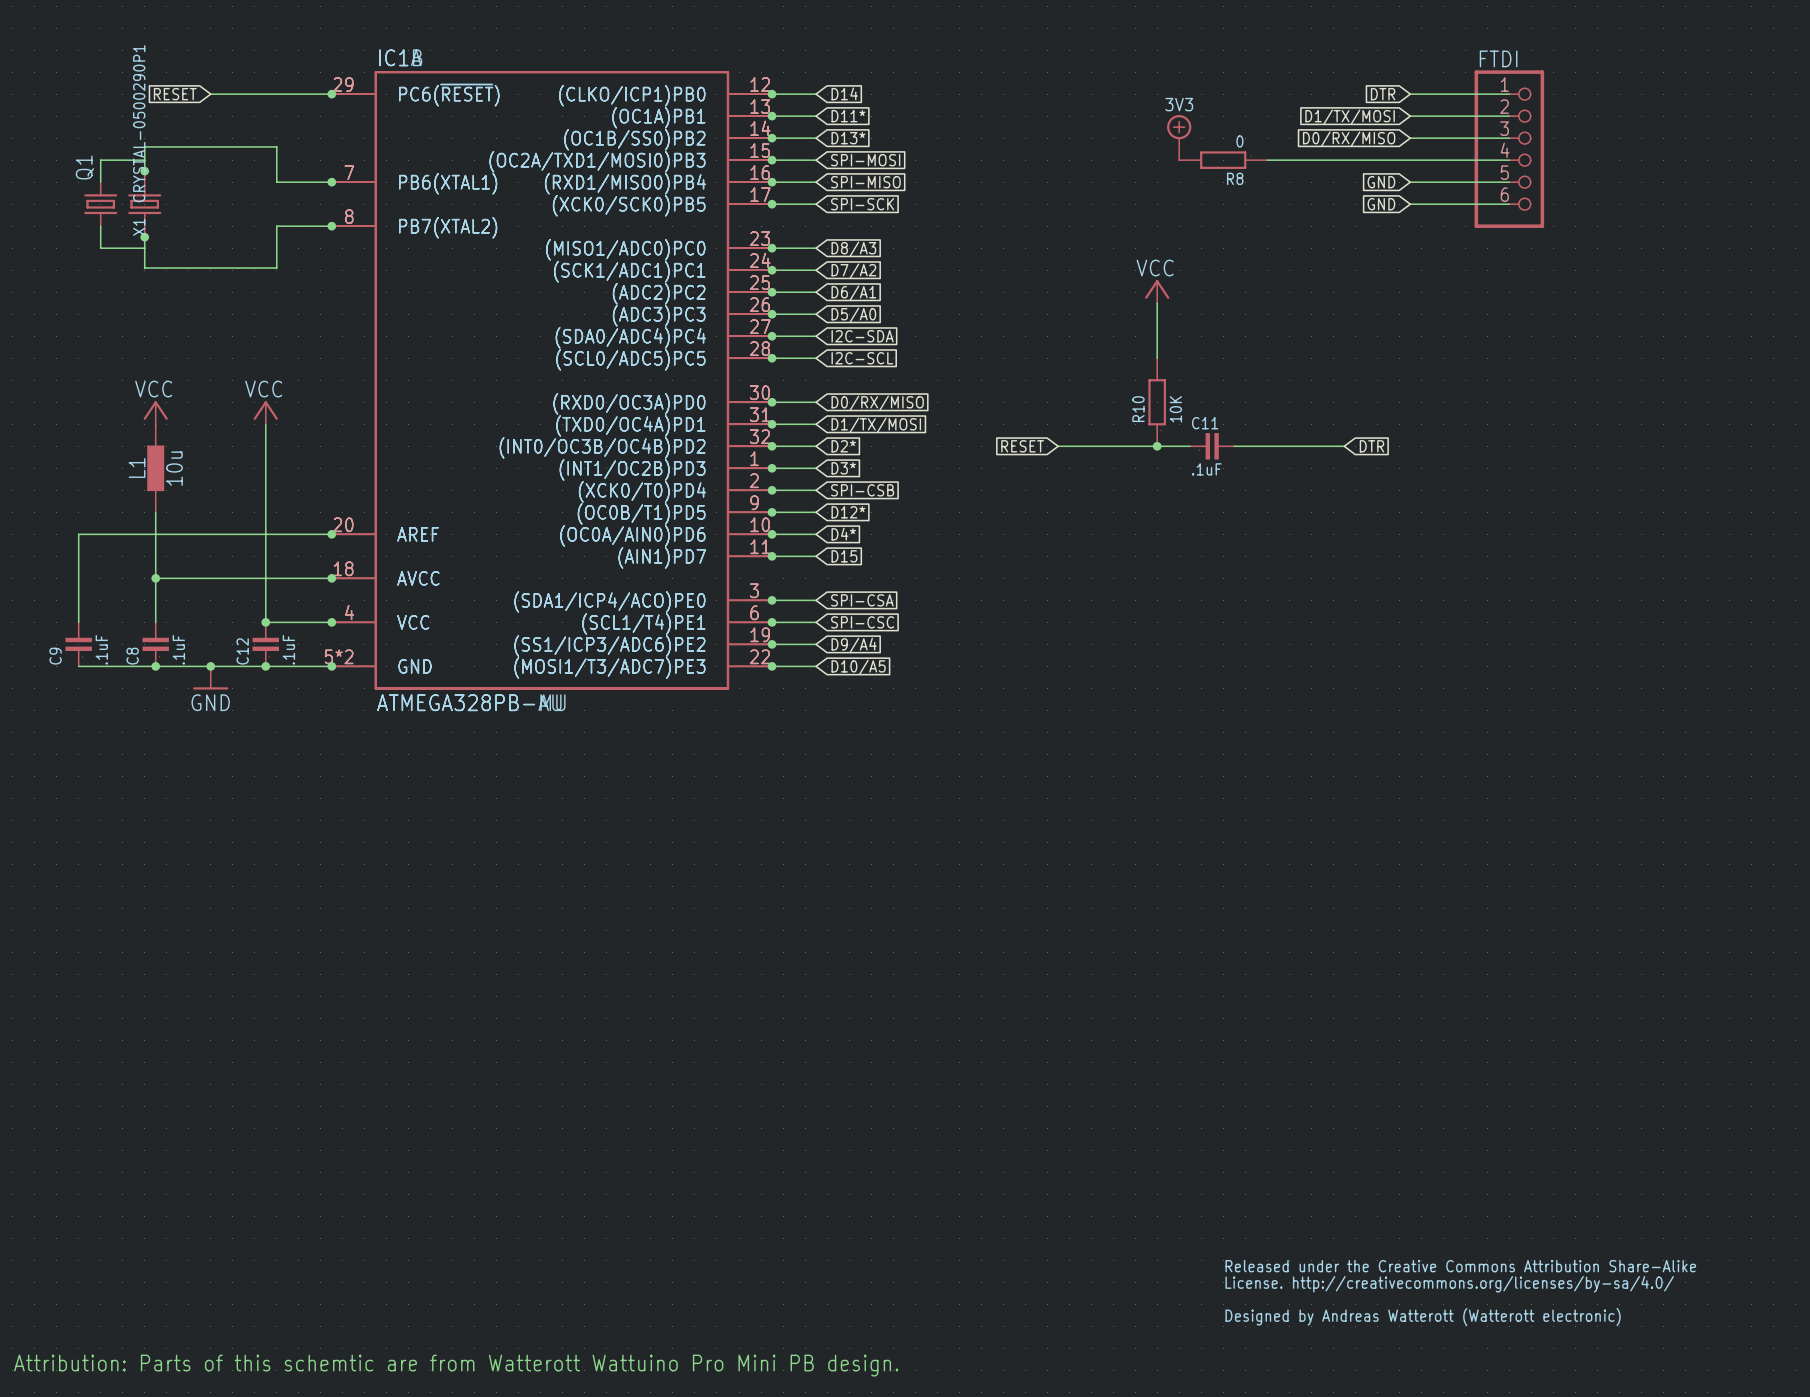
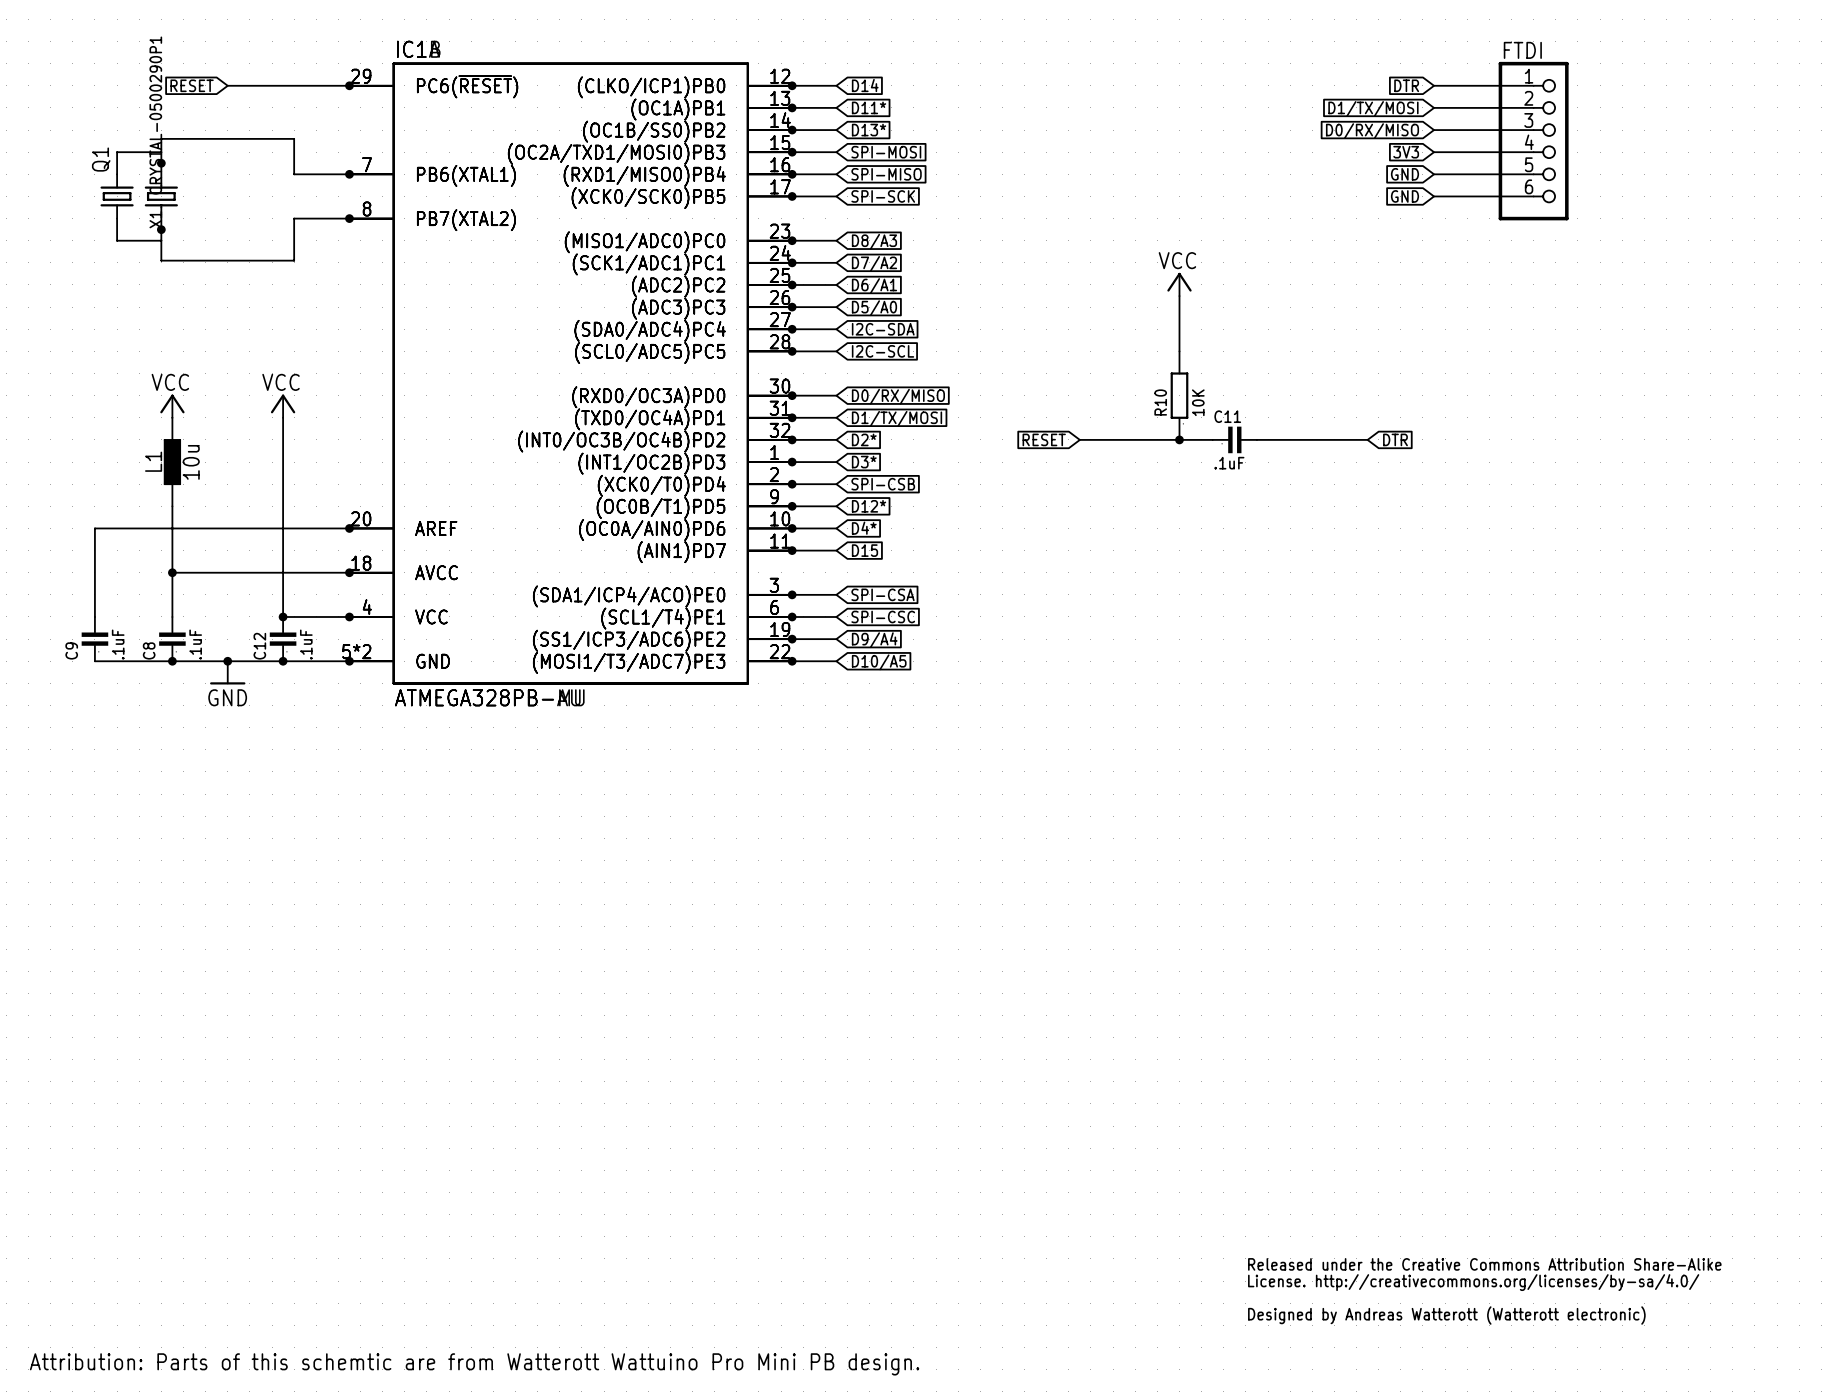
power symbol: 3V3 (1179, 137) -> none
R8: 0 (1223, 160) -> none
wire: (1267, 160) (1410, 160) -> none
global label: none -> 3V3 (1406, 152)

